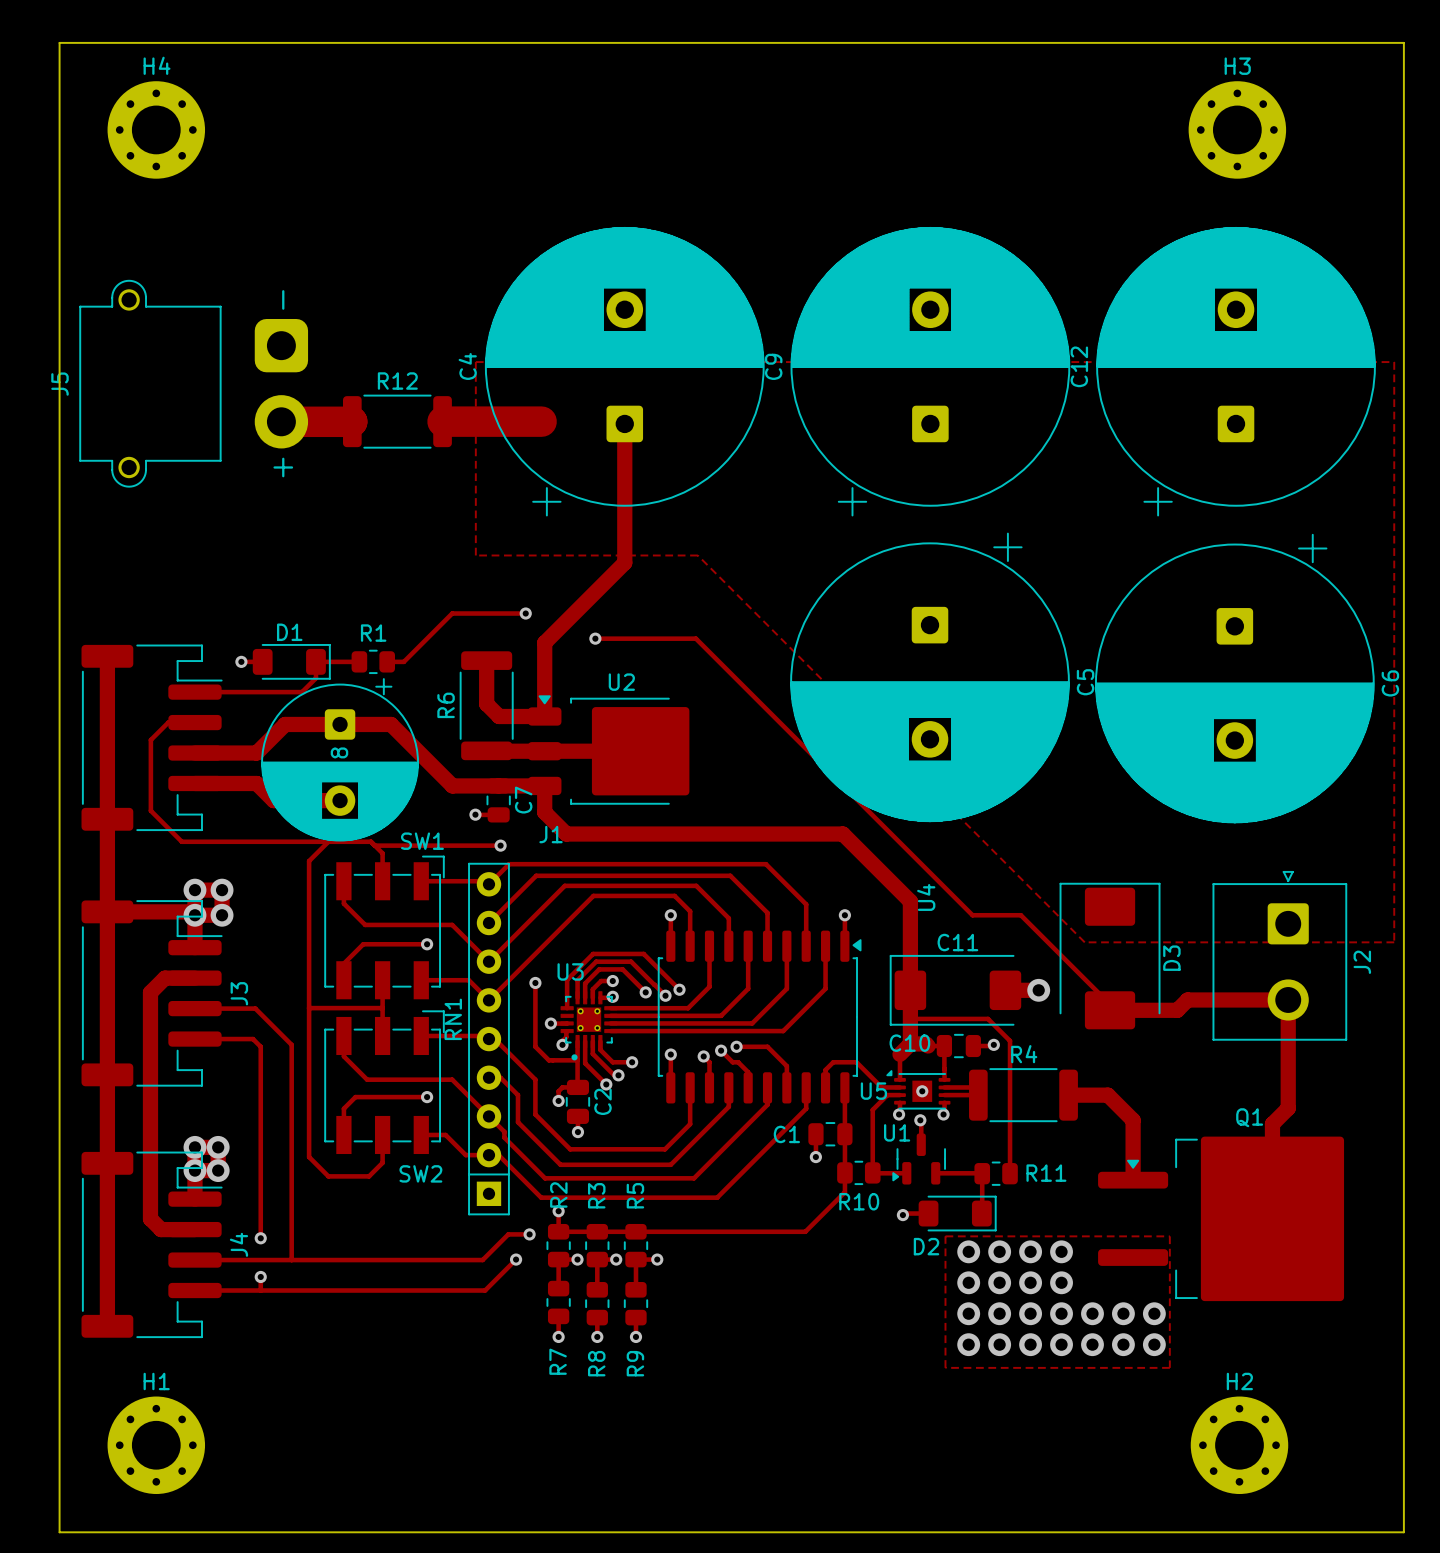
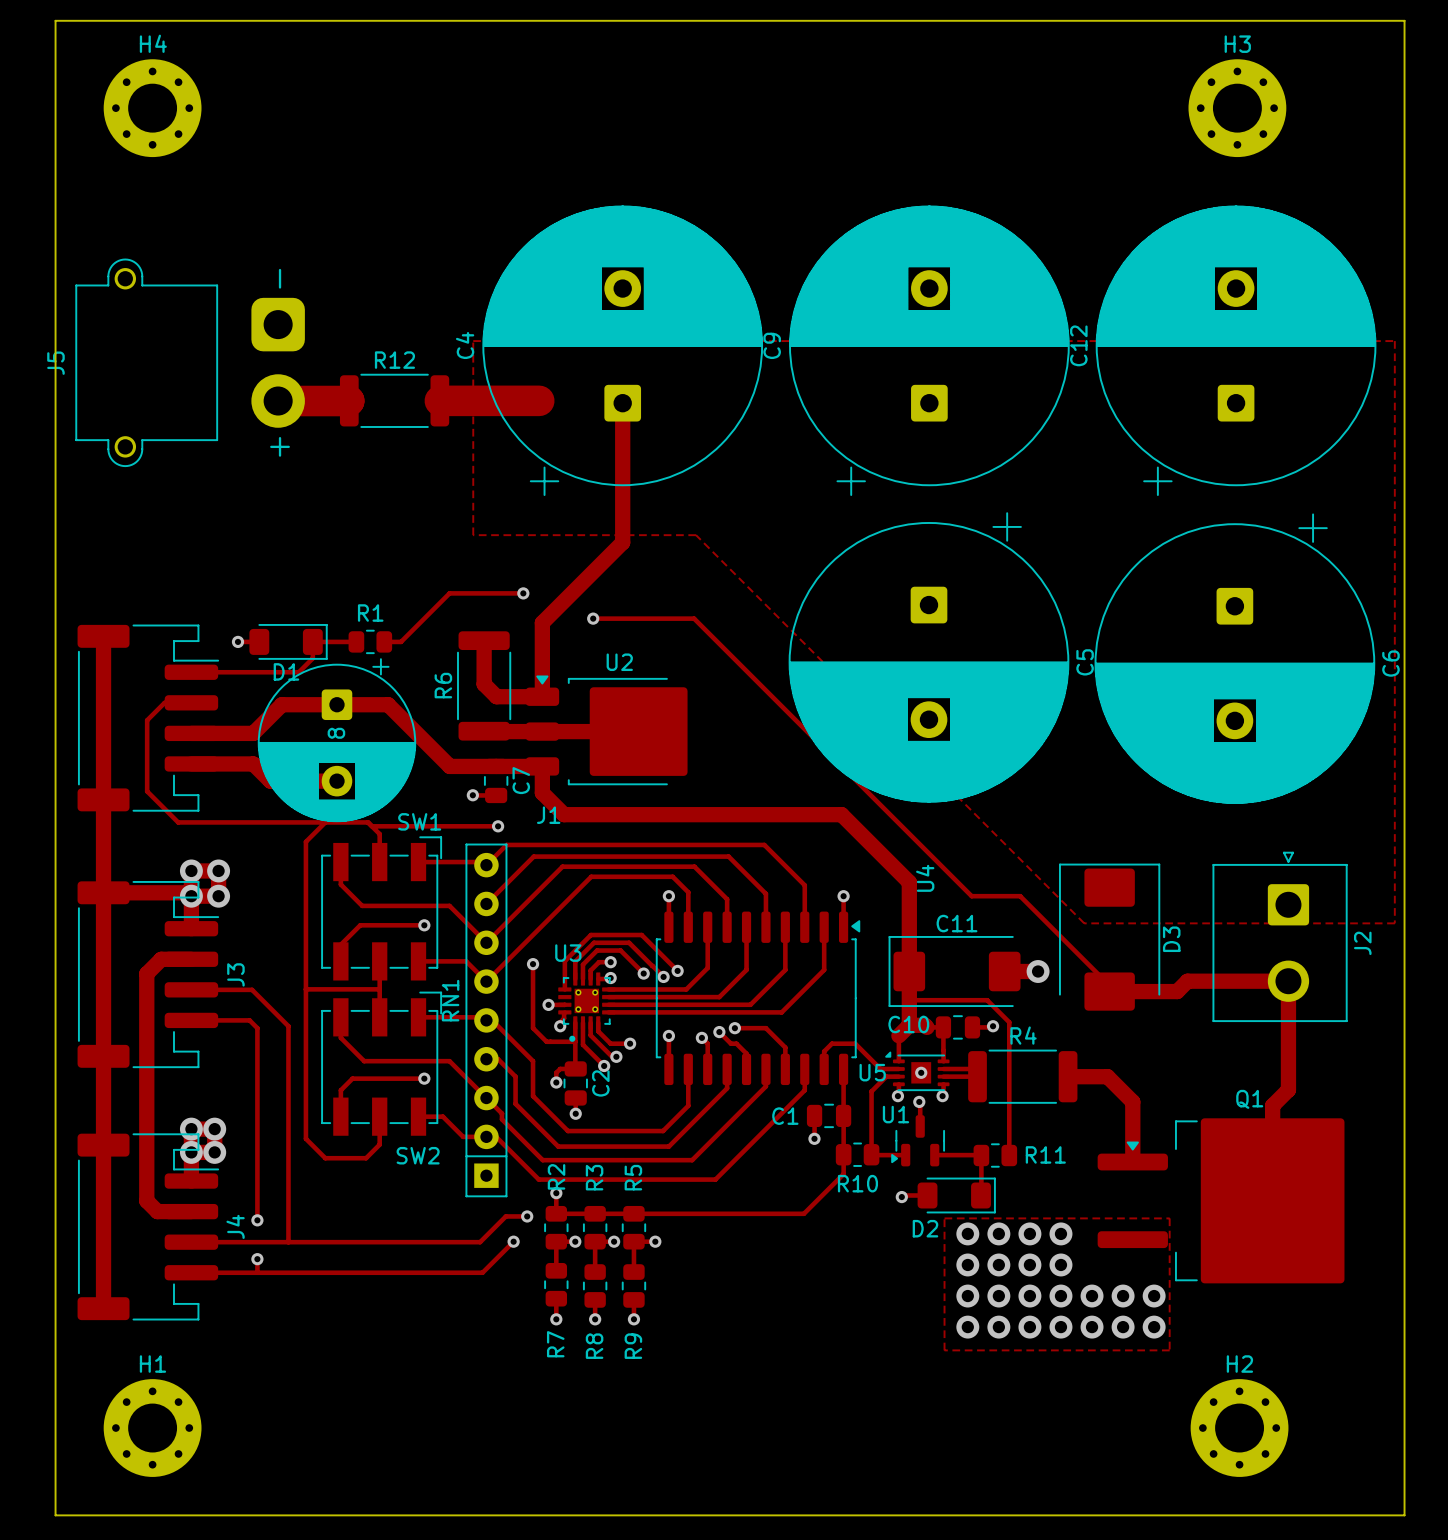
D1 name position: D1 (289, 632) -> D1 (286, 671)

